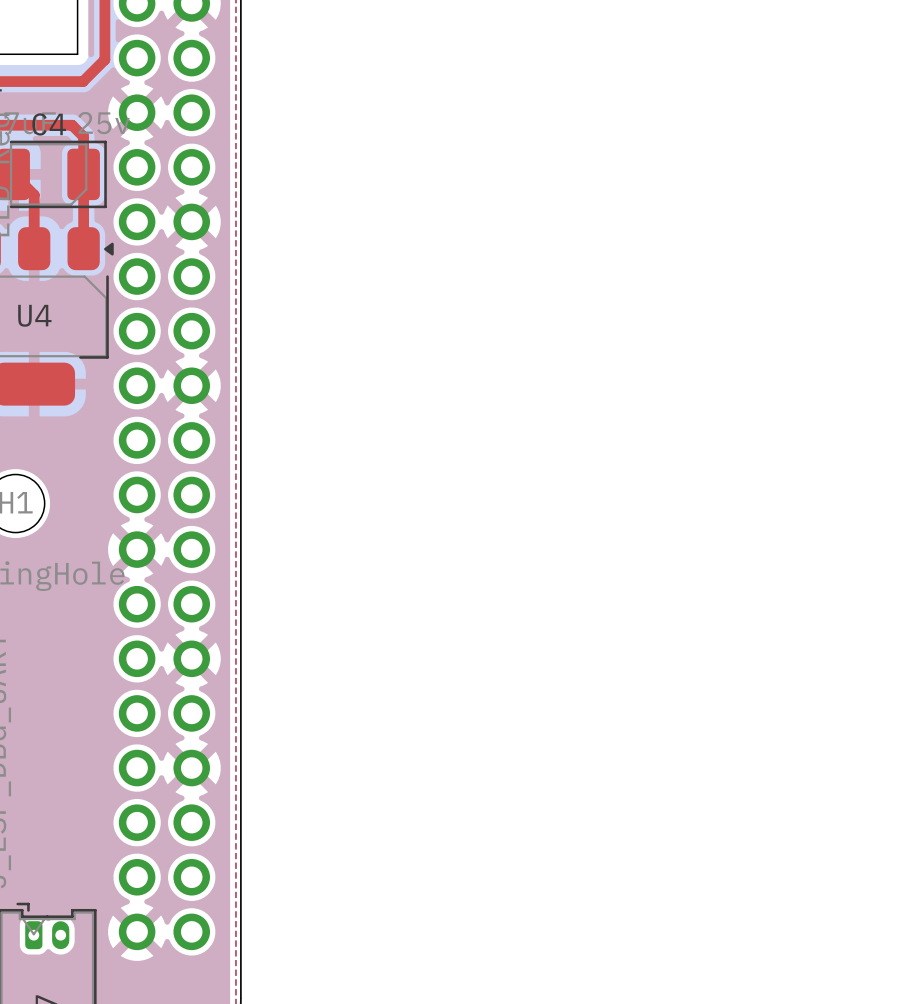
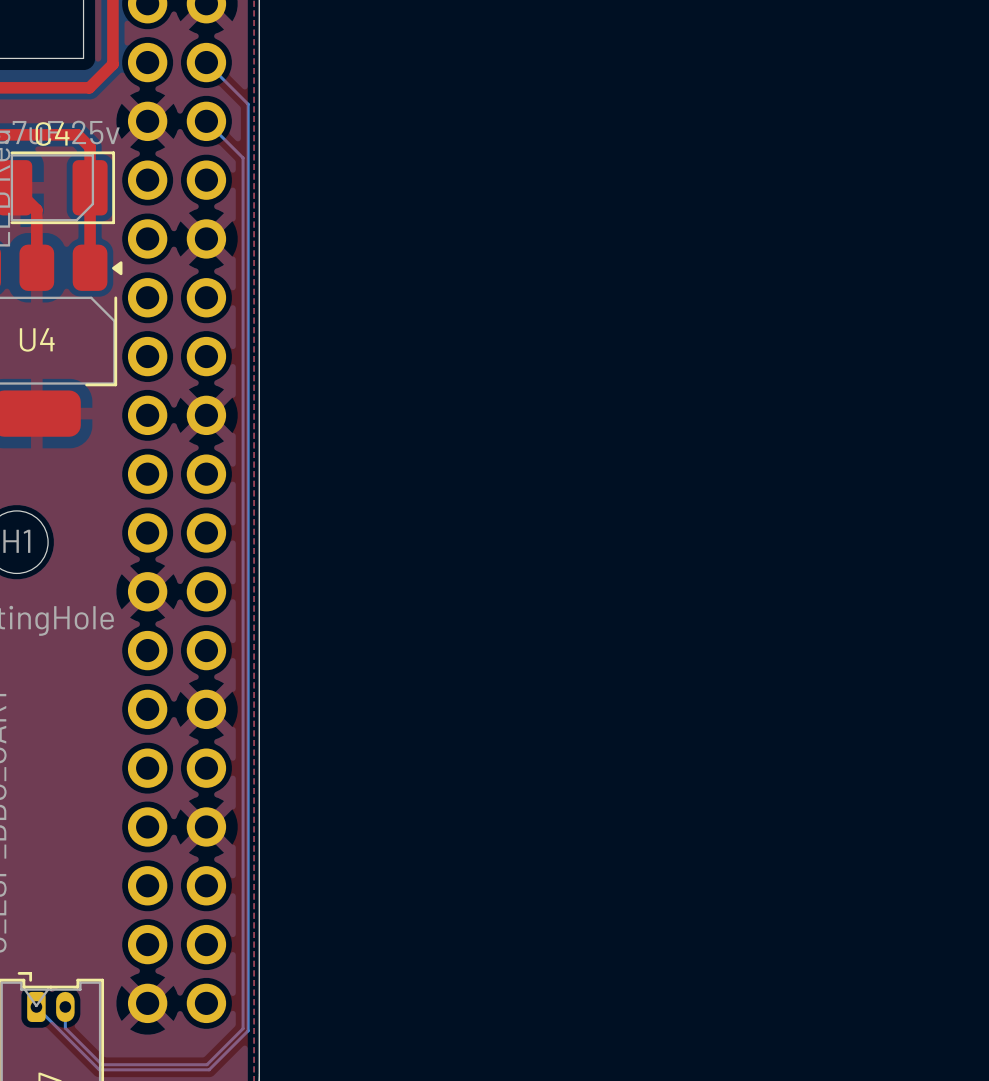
bottom track: none -> (206, 62) (248, 104) (248, 1030) (209, 1069) (99, 1069) (36, 1006)
bottom track: none -> (206, 121) (243, 157) (243, 1028) (207, 1064) (101, 1064) (65, 1028) (65, 1006)

